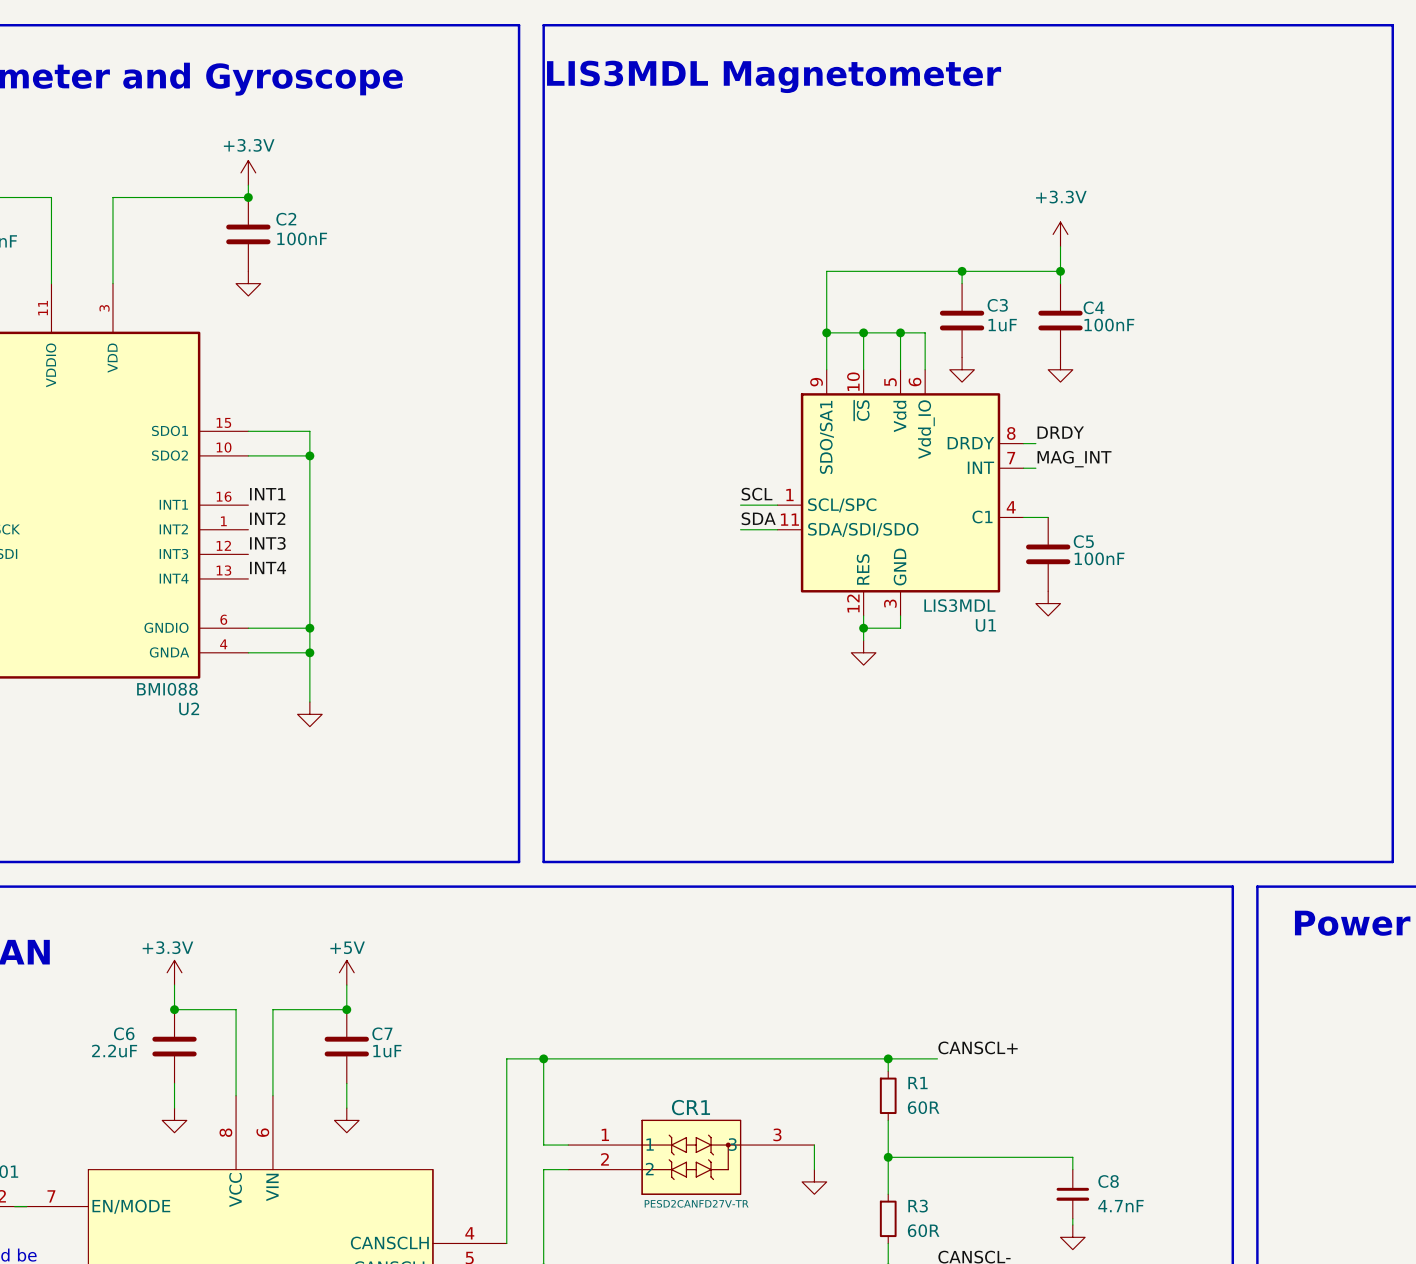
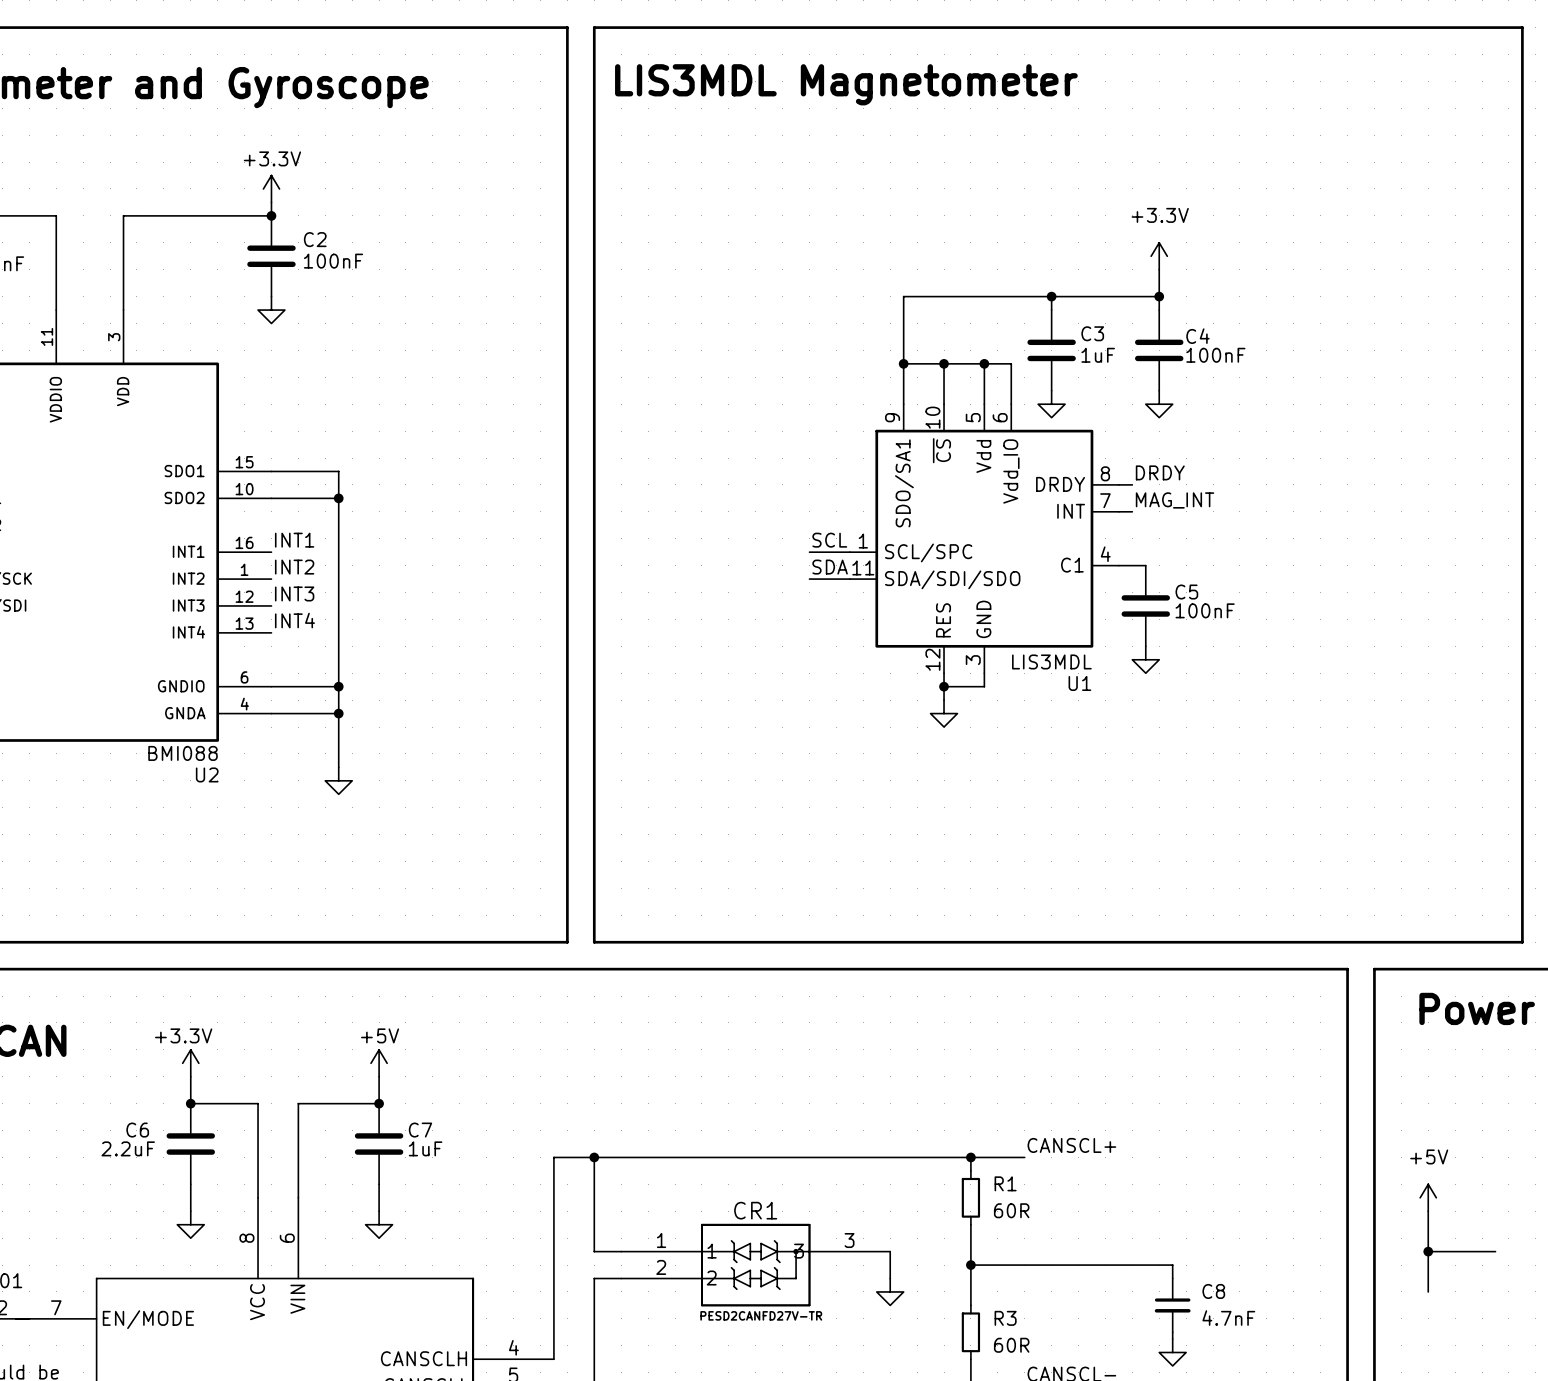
power symbol: none -> +5V (1428, 1197)
wire: none -> (1428, 1211) (1428, 1291)
wire: none -> (1428, 1251) (1495, 1251)
junction: none -> (1428, 1251)

